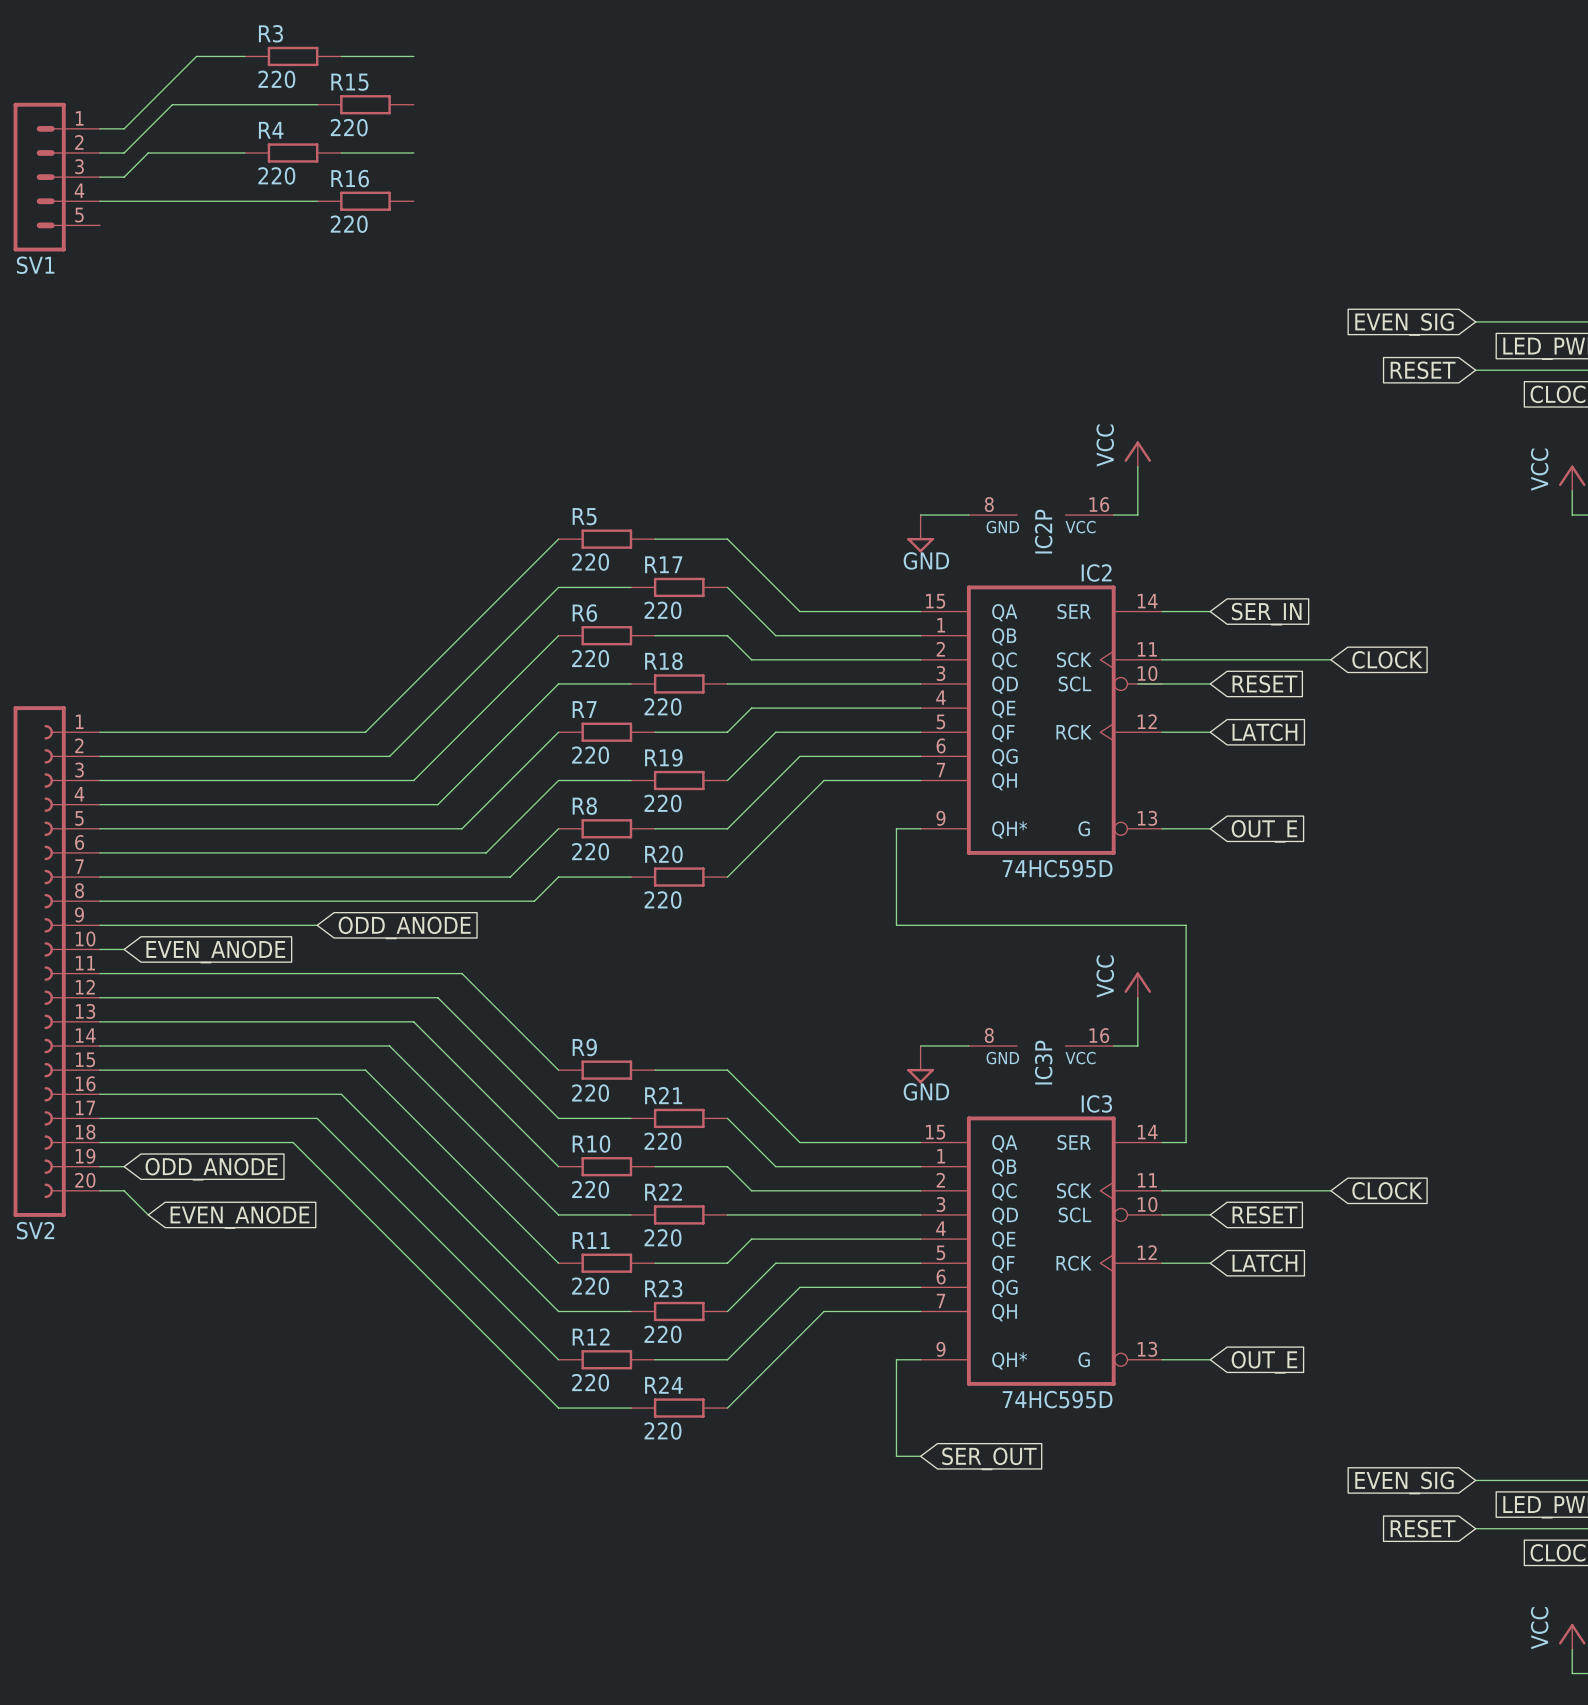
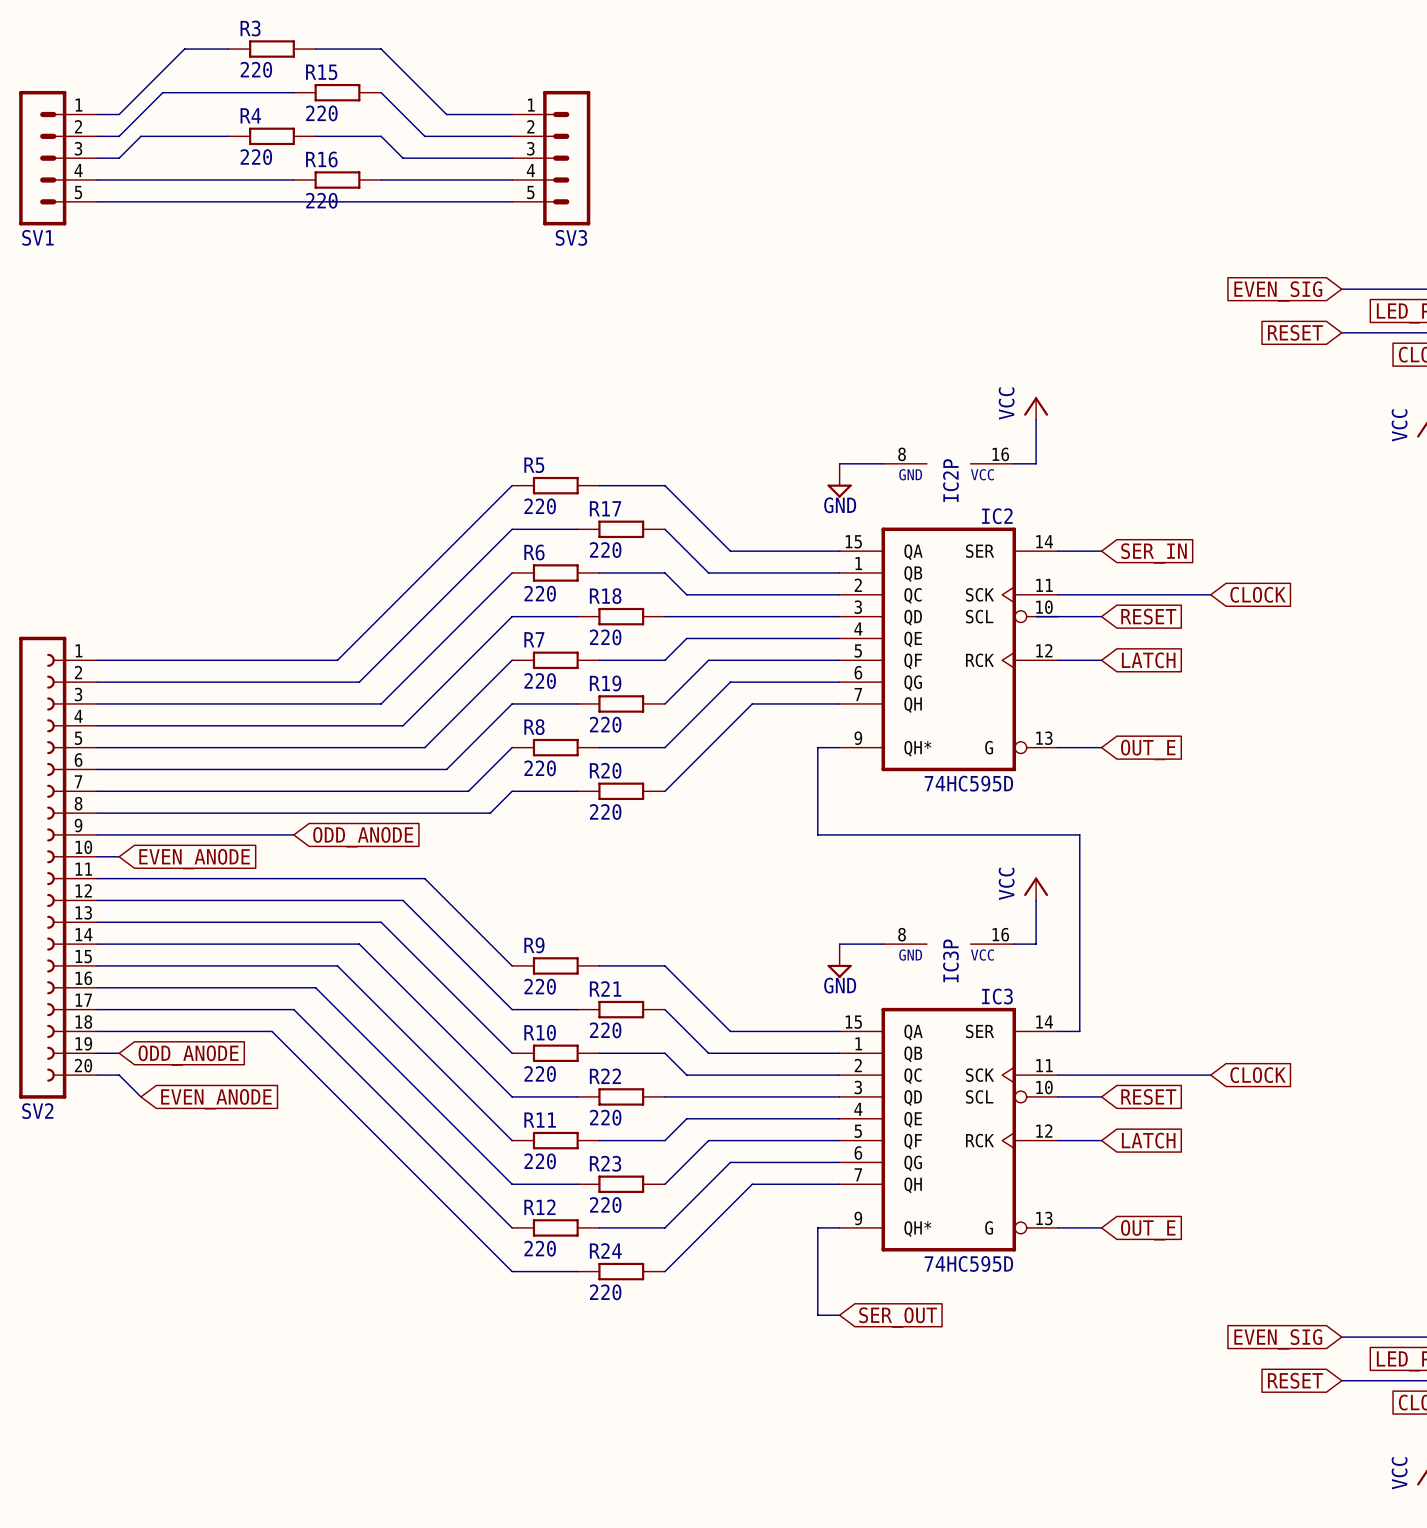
wire: none -> (381, 49) (446, 114) (512, 114)
wire: none -> (381, 92) (424, 136) (512, 136)
wire: none -> (381, 136) (402, 158) (512, 158)
SV3: none -> (551, 158)
wire: none -> (381, 180) (512, 180)
wire: none -> (97, 201) (512, 201)

